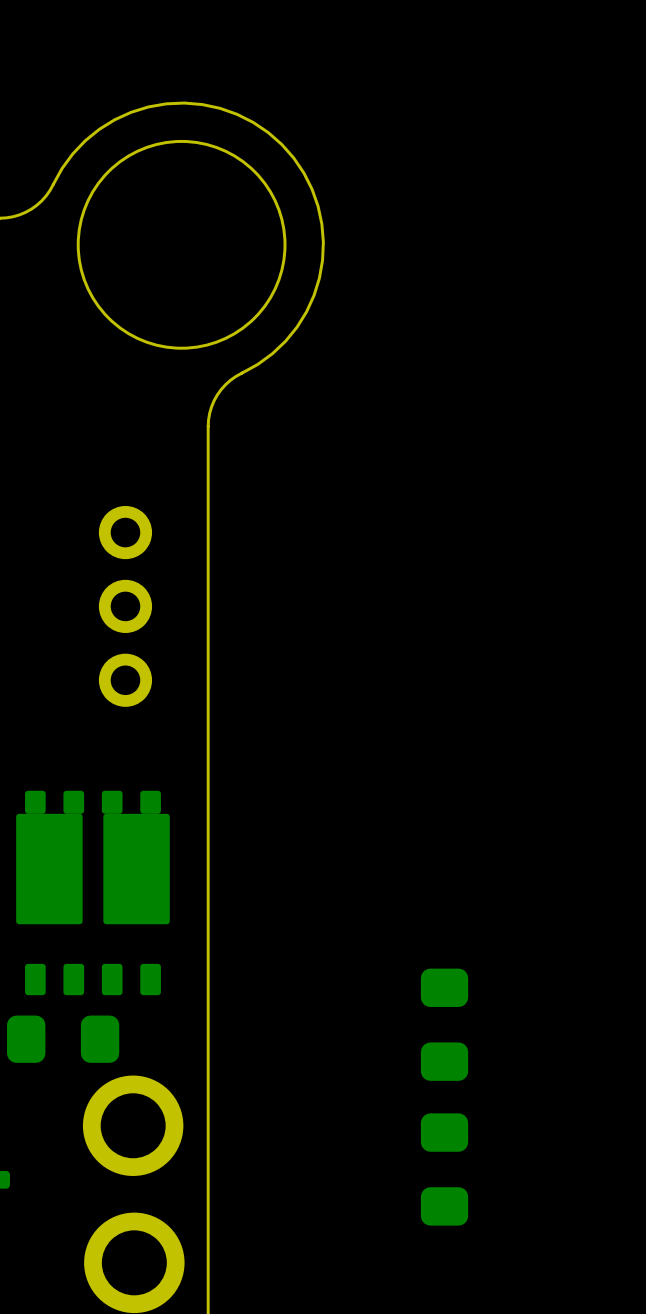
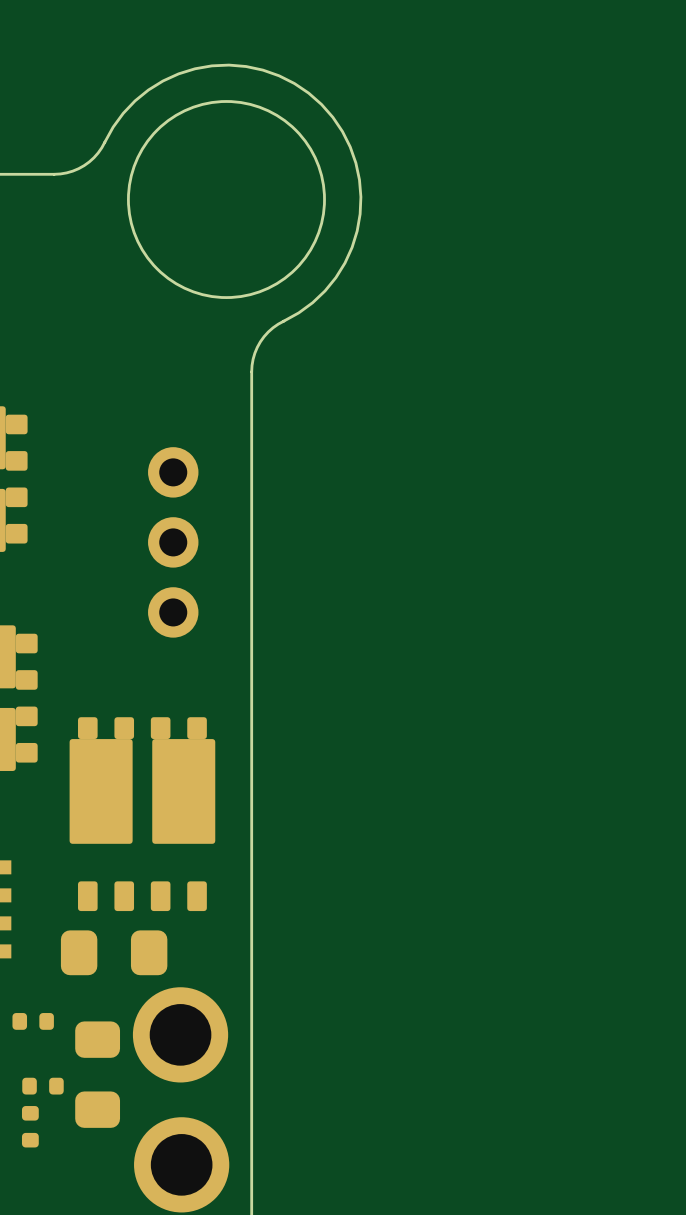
part: (444, 1024) -> none
part: none -> (97, 1074)
part: (444, 1169) -> none

